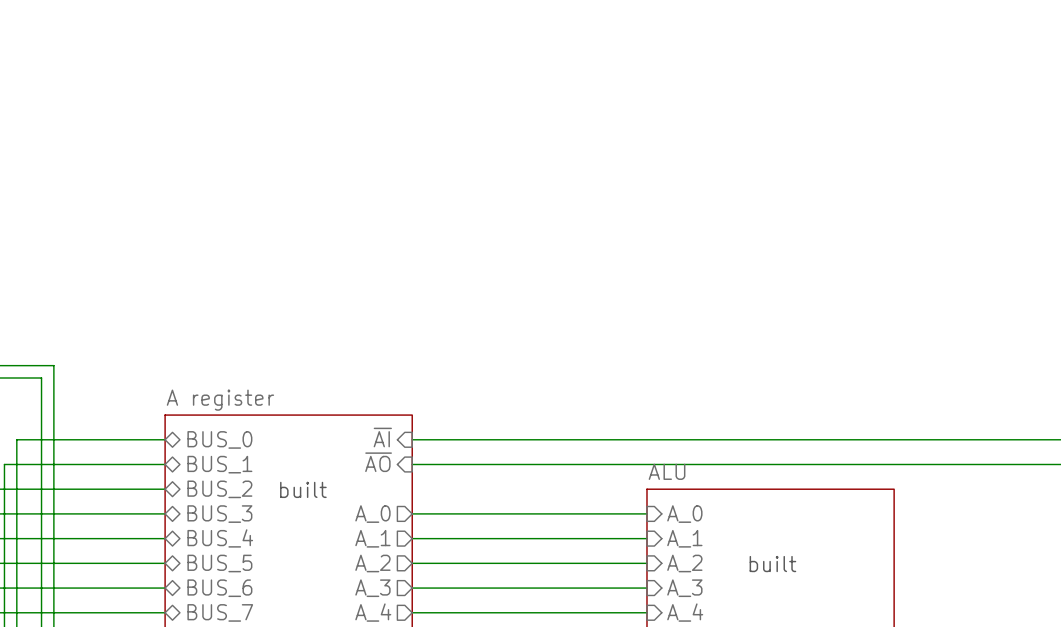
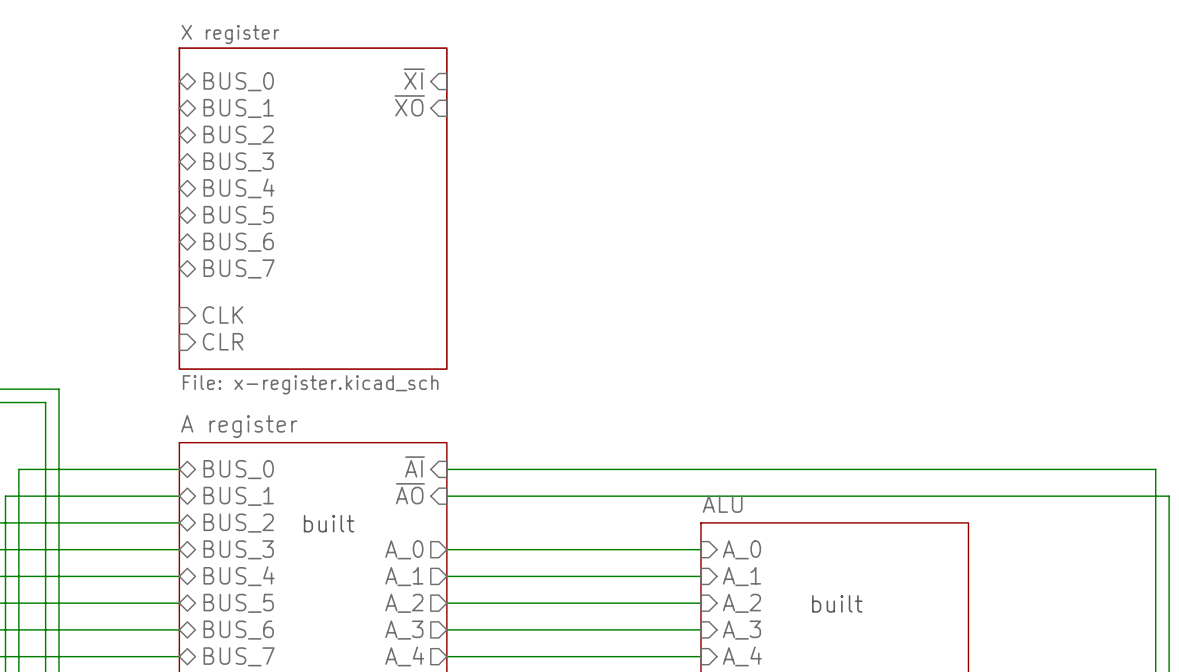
sheet pin: none -> ~{XI} (414, 79)
sheet pin: none -> BUS_0 (238, 81)
sheet pin: none -> ~{XO} (409, 105)
sheet pin: none -> BUS_1 (238, 108)
sheet pin: none -> BUS_2 (238, 135)
sheet pin: none -> BUS_3 (238, 161)
sheet pin: none -> BUS_4 (239, 188)
sheet X register: none -> File: x-register.kicad_sch (313, 208)
sheet pin: none -> BUS_5 (238, 215)
sheet pin: none -> BUS_6 (238, 242)
sheet pin: none -> BUS_7 (239, 268)
sheet pin: none -> CLK (223, 315)
sheet pin: none -> CLR (223, 341)

